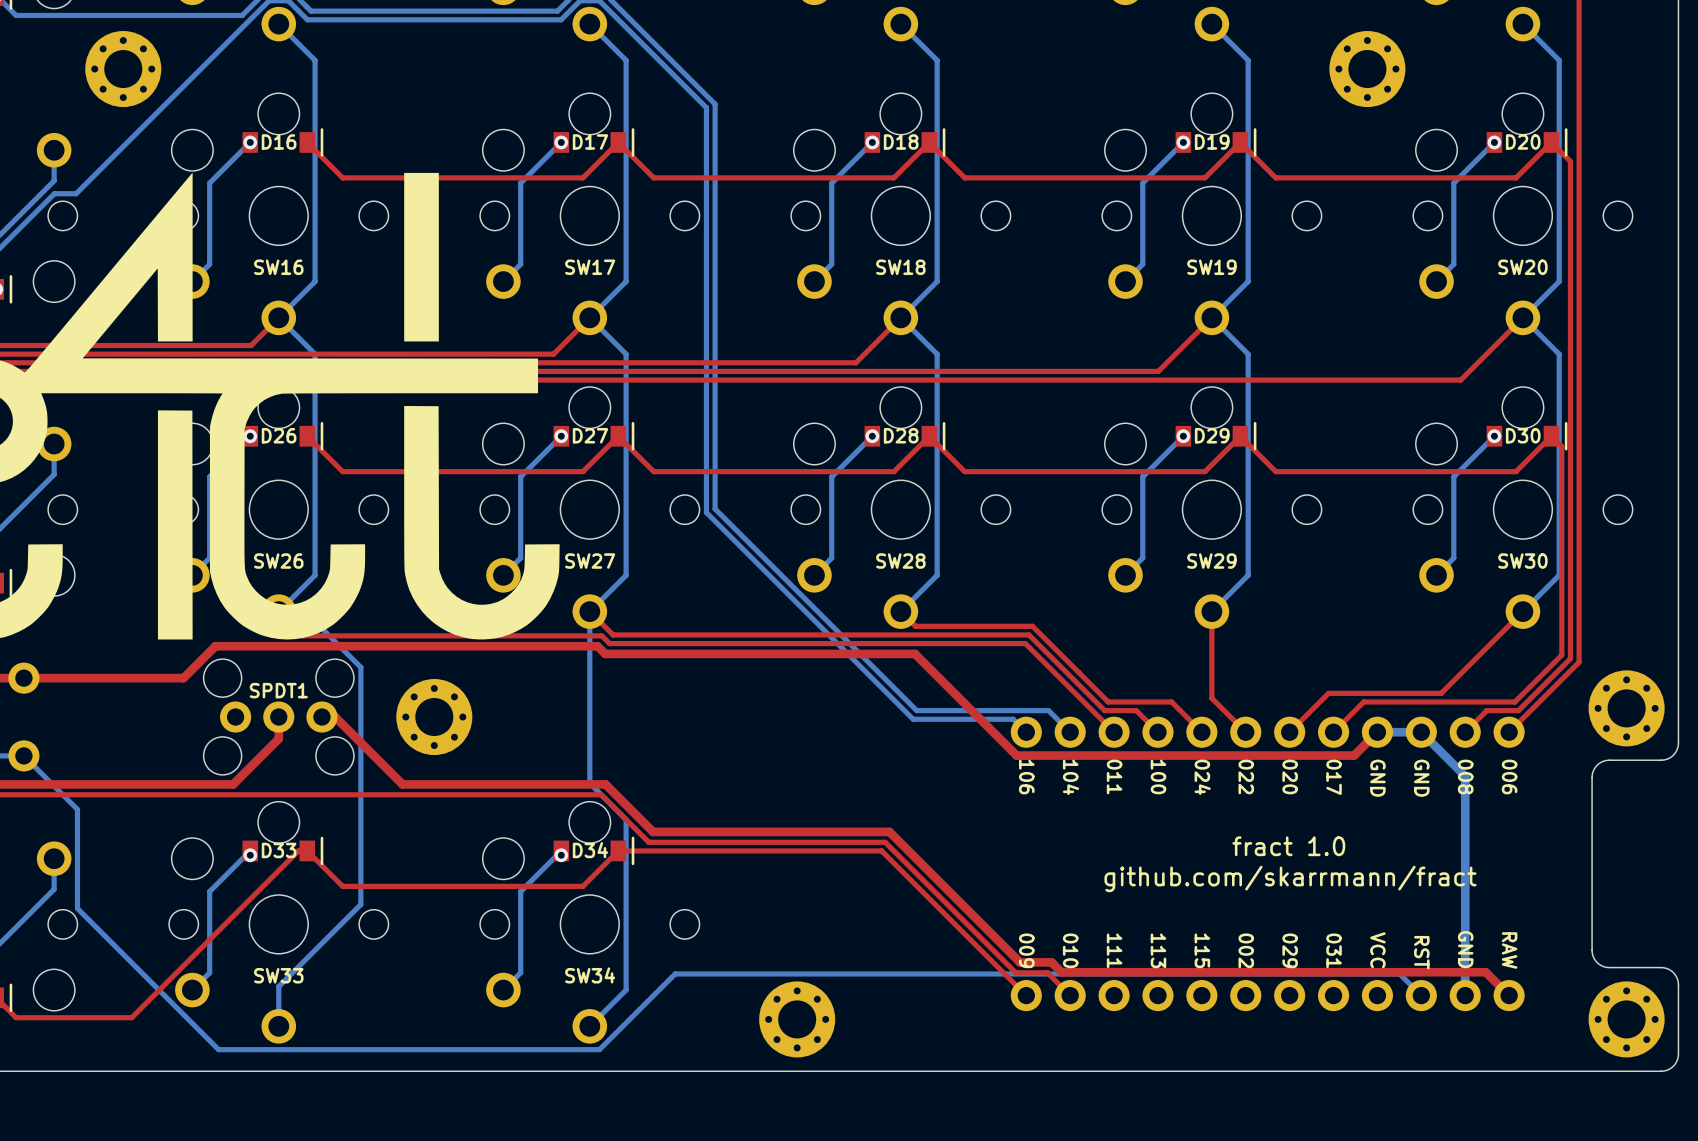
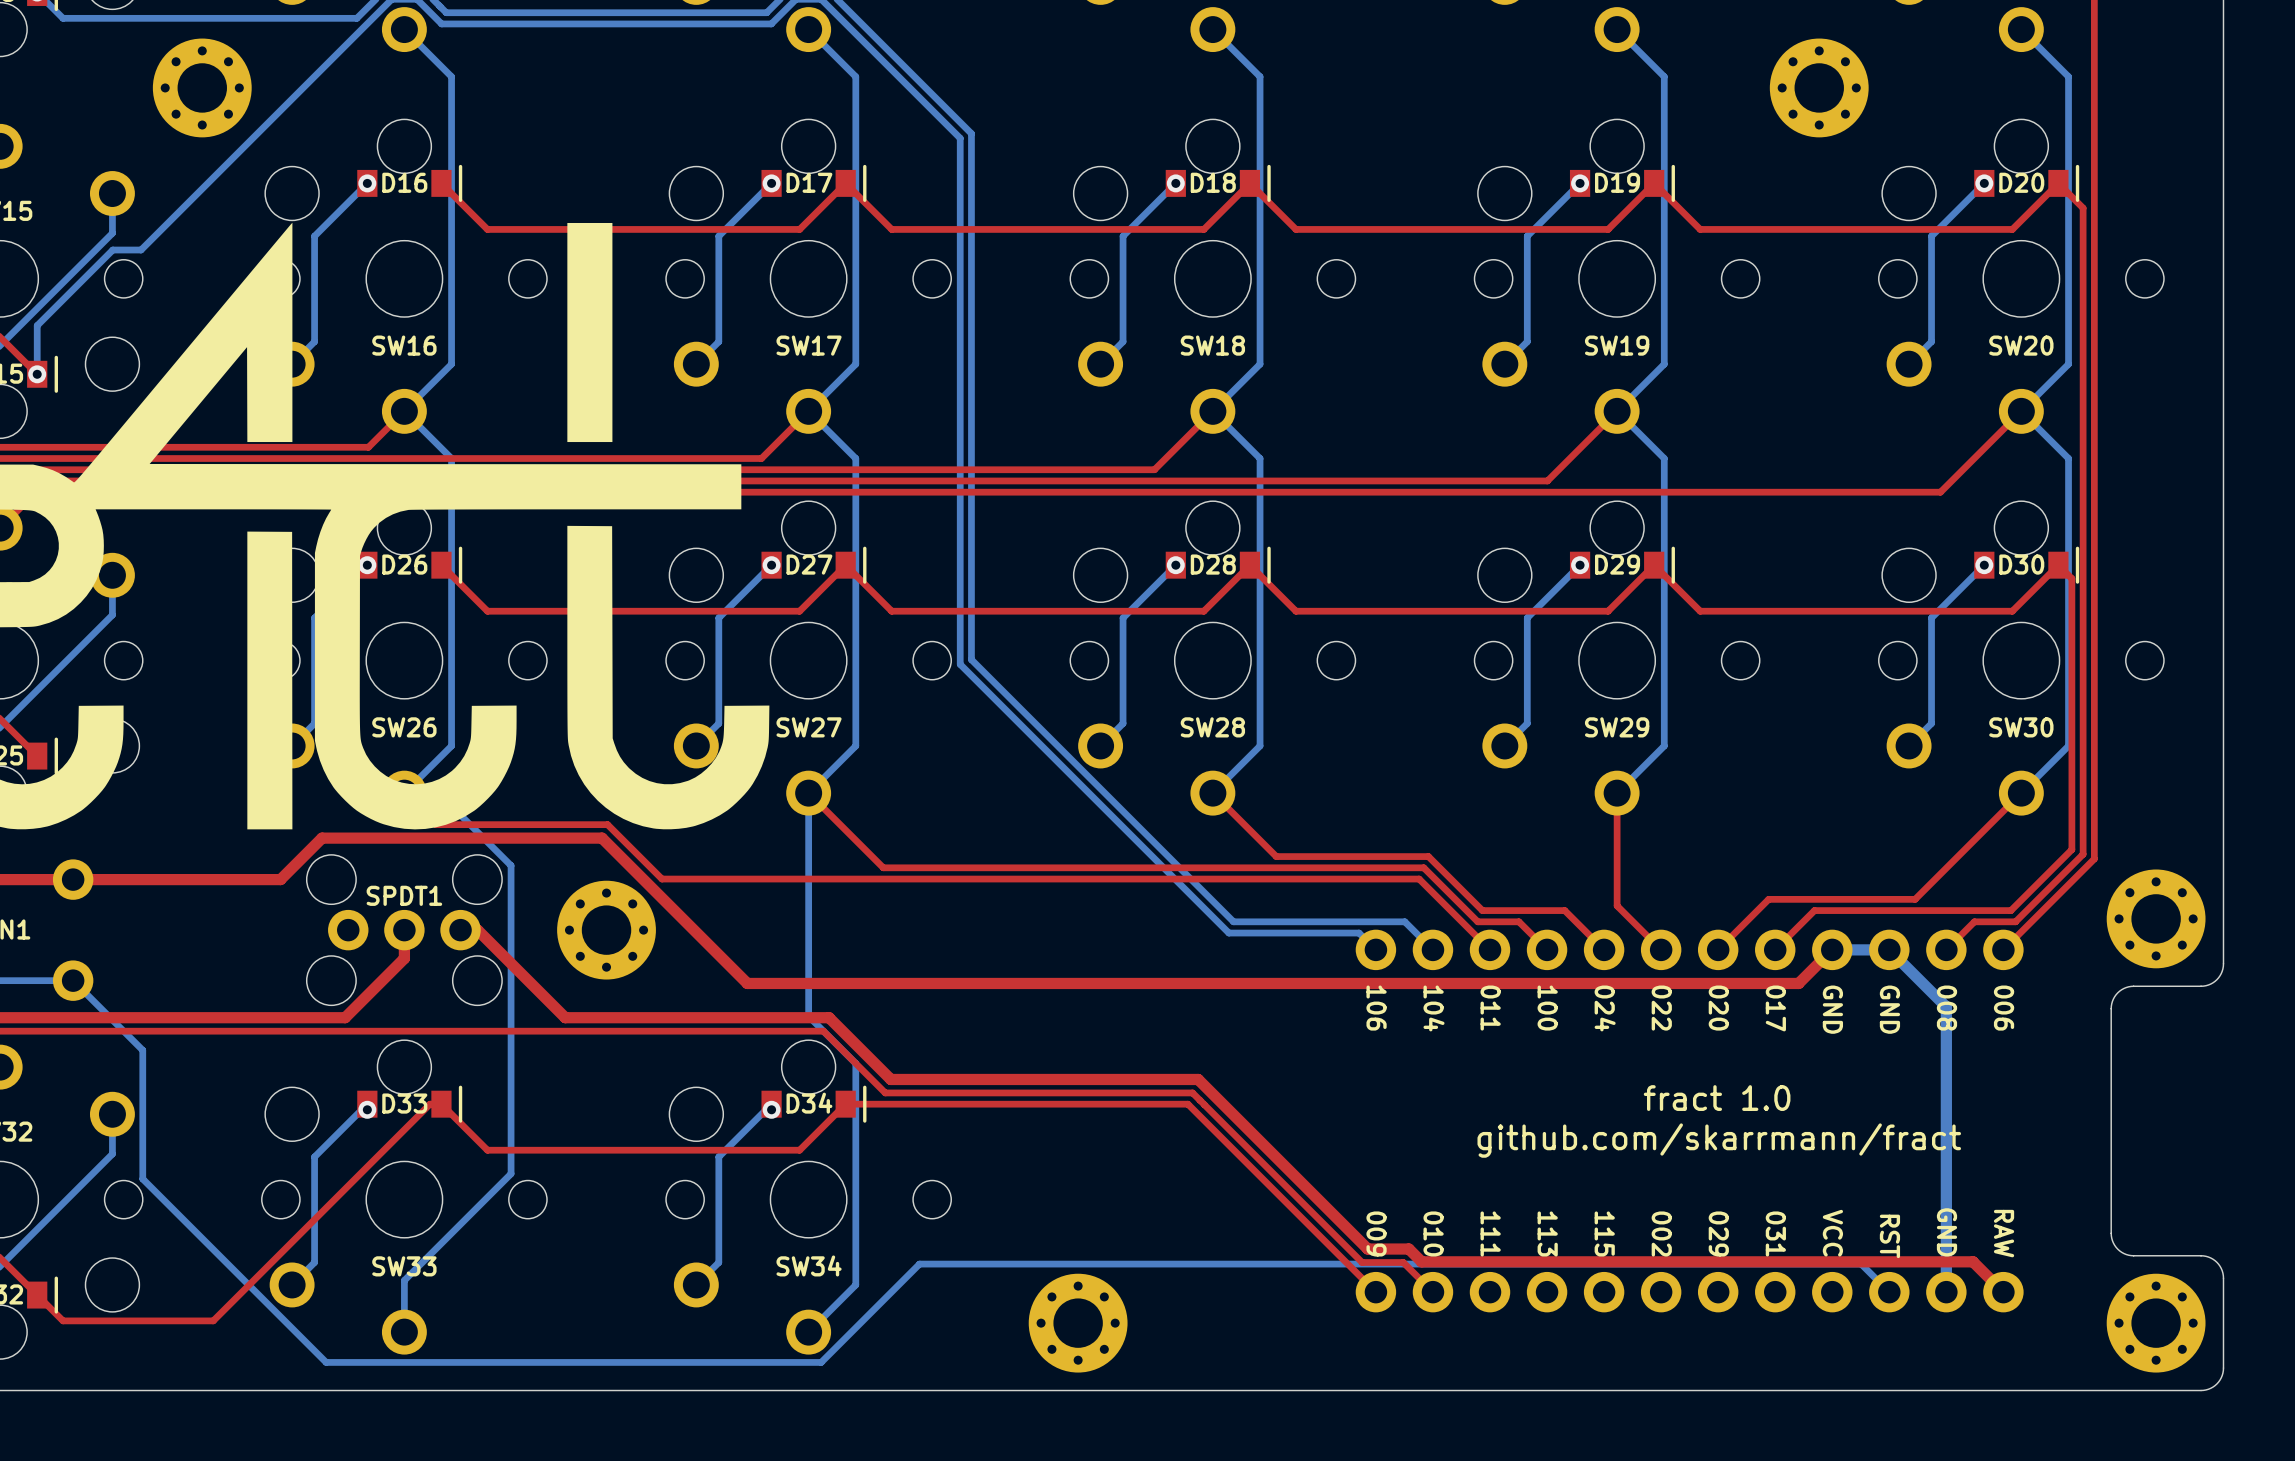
top track: (915, 626) (1032, 626) (1066, 660) -> (1231, 812) (1276, 856) (1428, 856)
top track: (613, 634) (1029, 634) (1063, 669) -> (838, 823) (883, 867) (1423, 867)
top track: (435, 635) (601, 635) (609, 643) (1025, 643) (1059, 677) -> (607, 824) (661, 879) (1419, 879)
top track: (430, 646) (597, 646) (605, 653) (915, 653) (1016, 755) (1354, 755) -> (602, 838) (747, 983) (1798, 983) (1801, 980)

